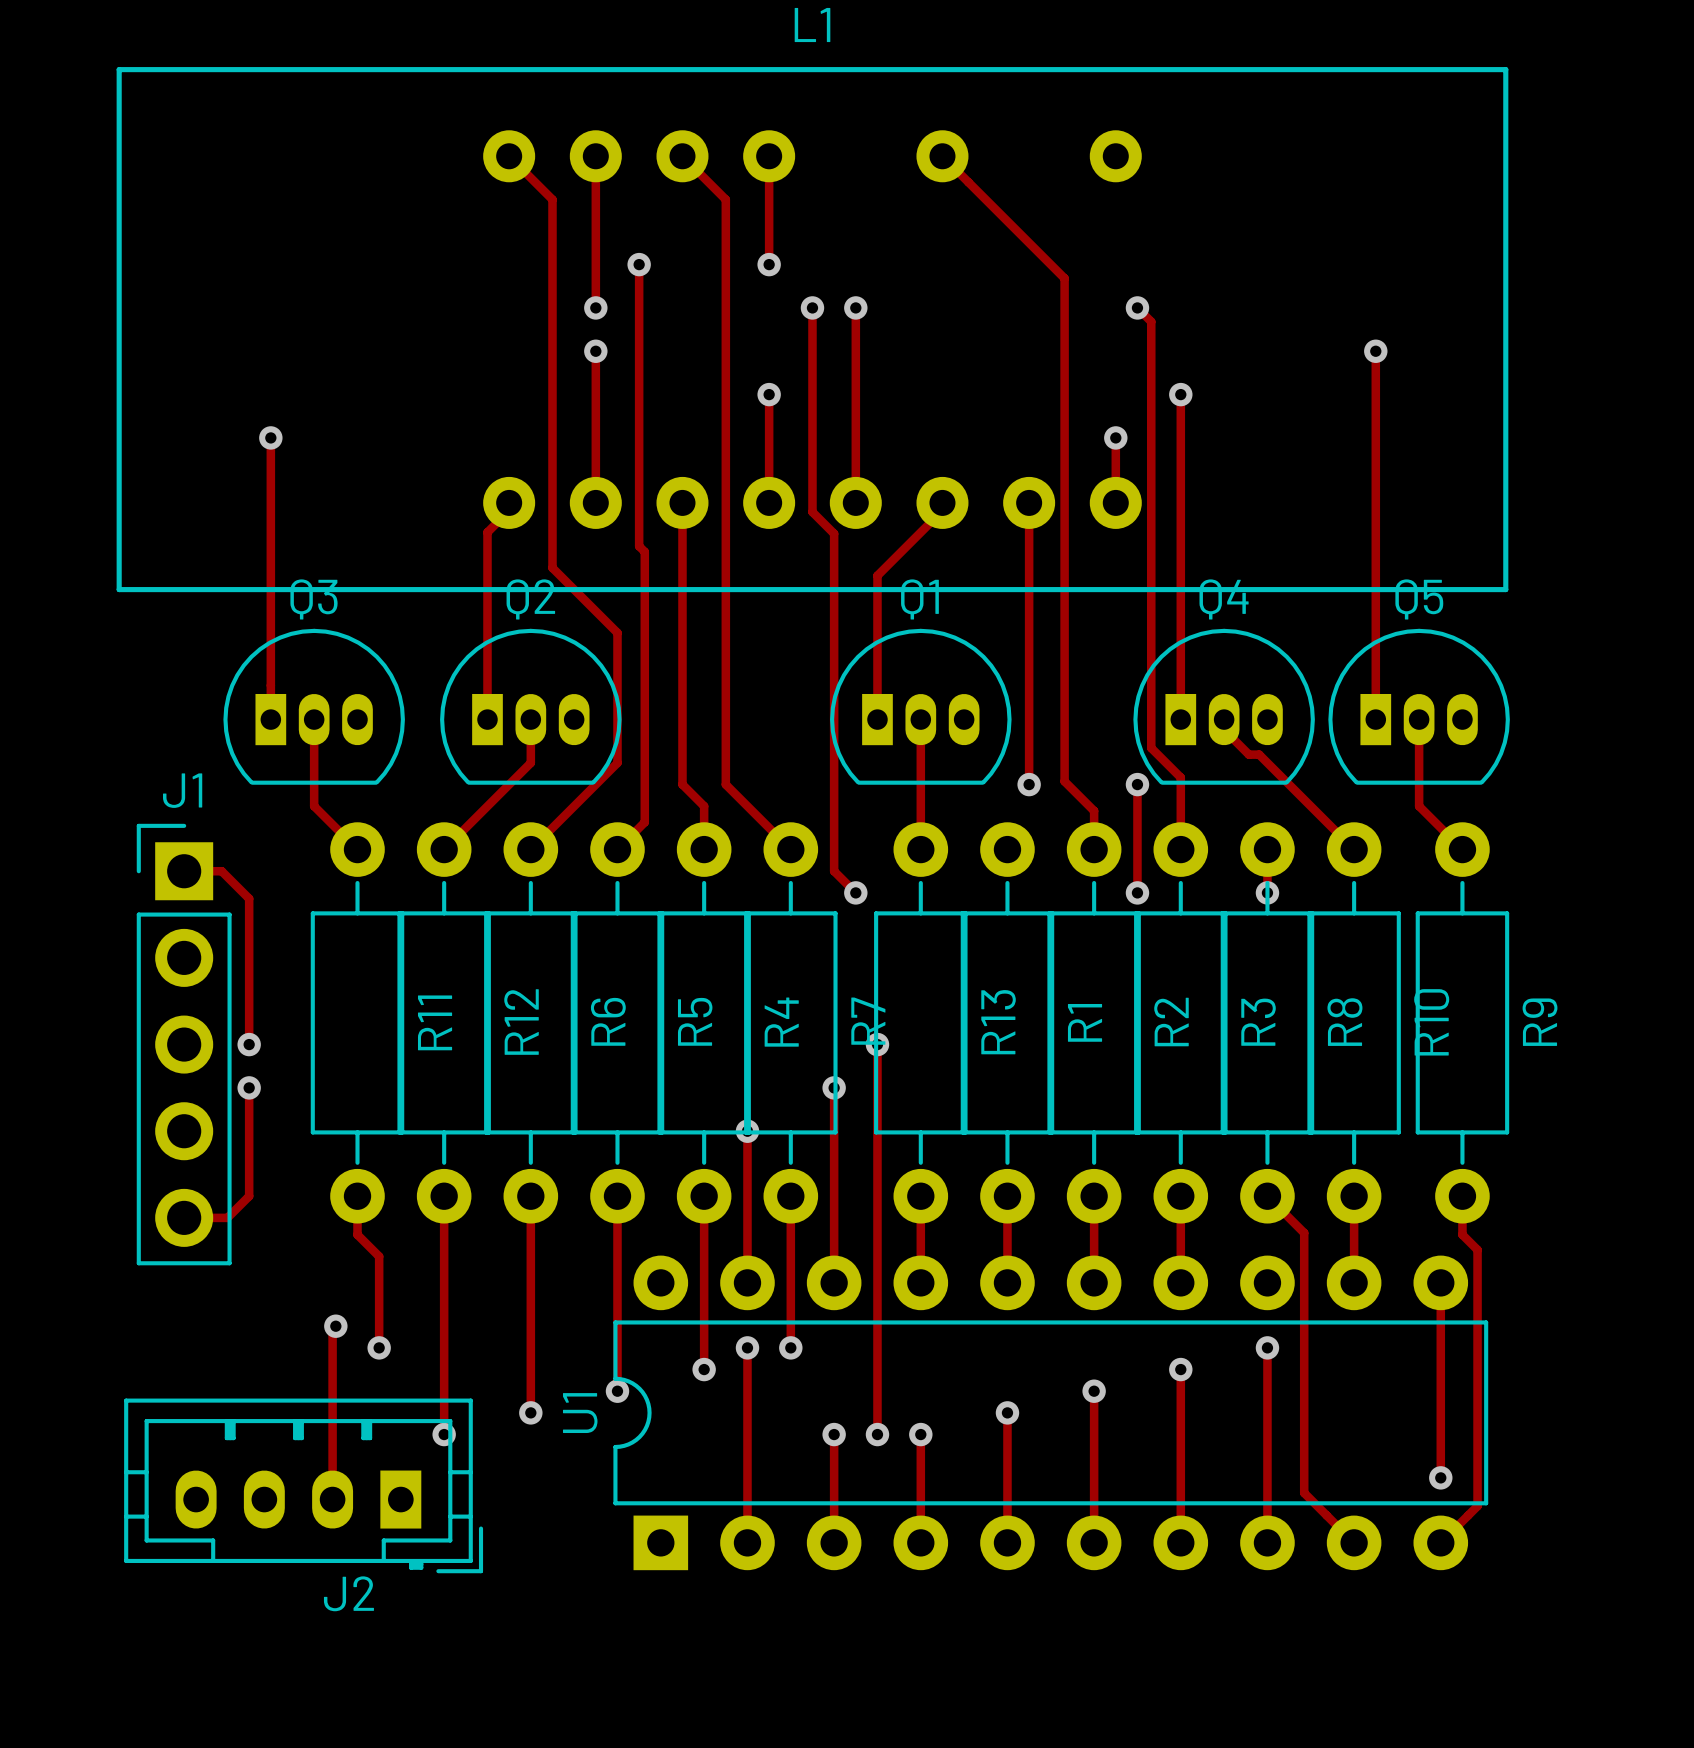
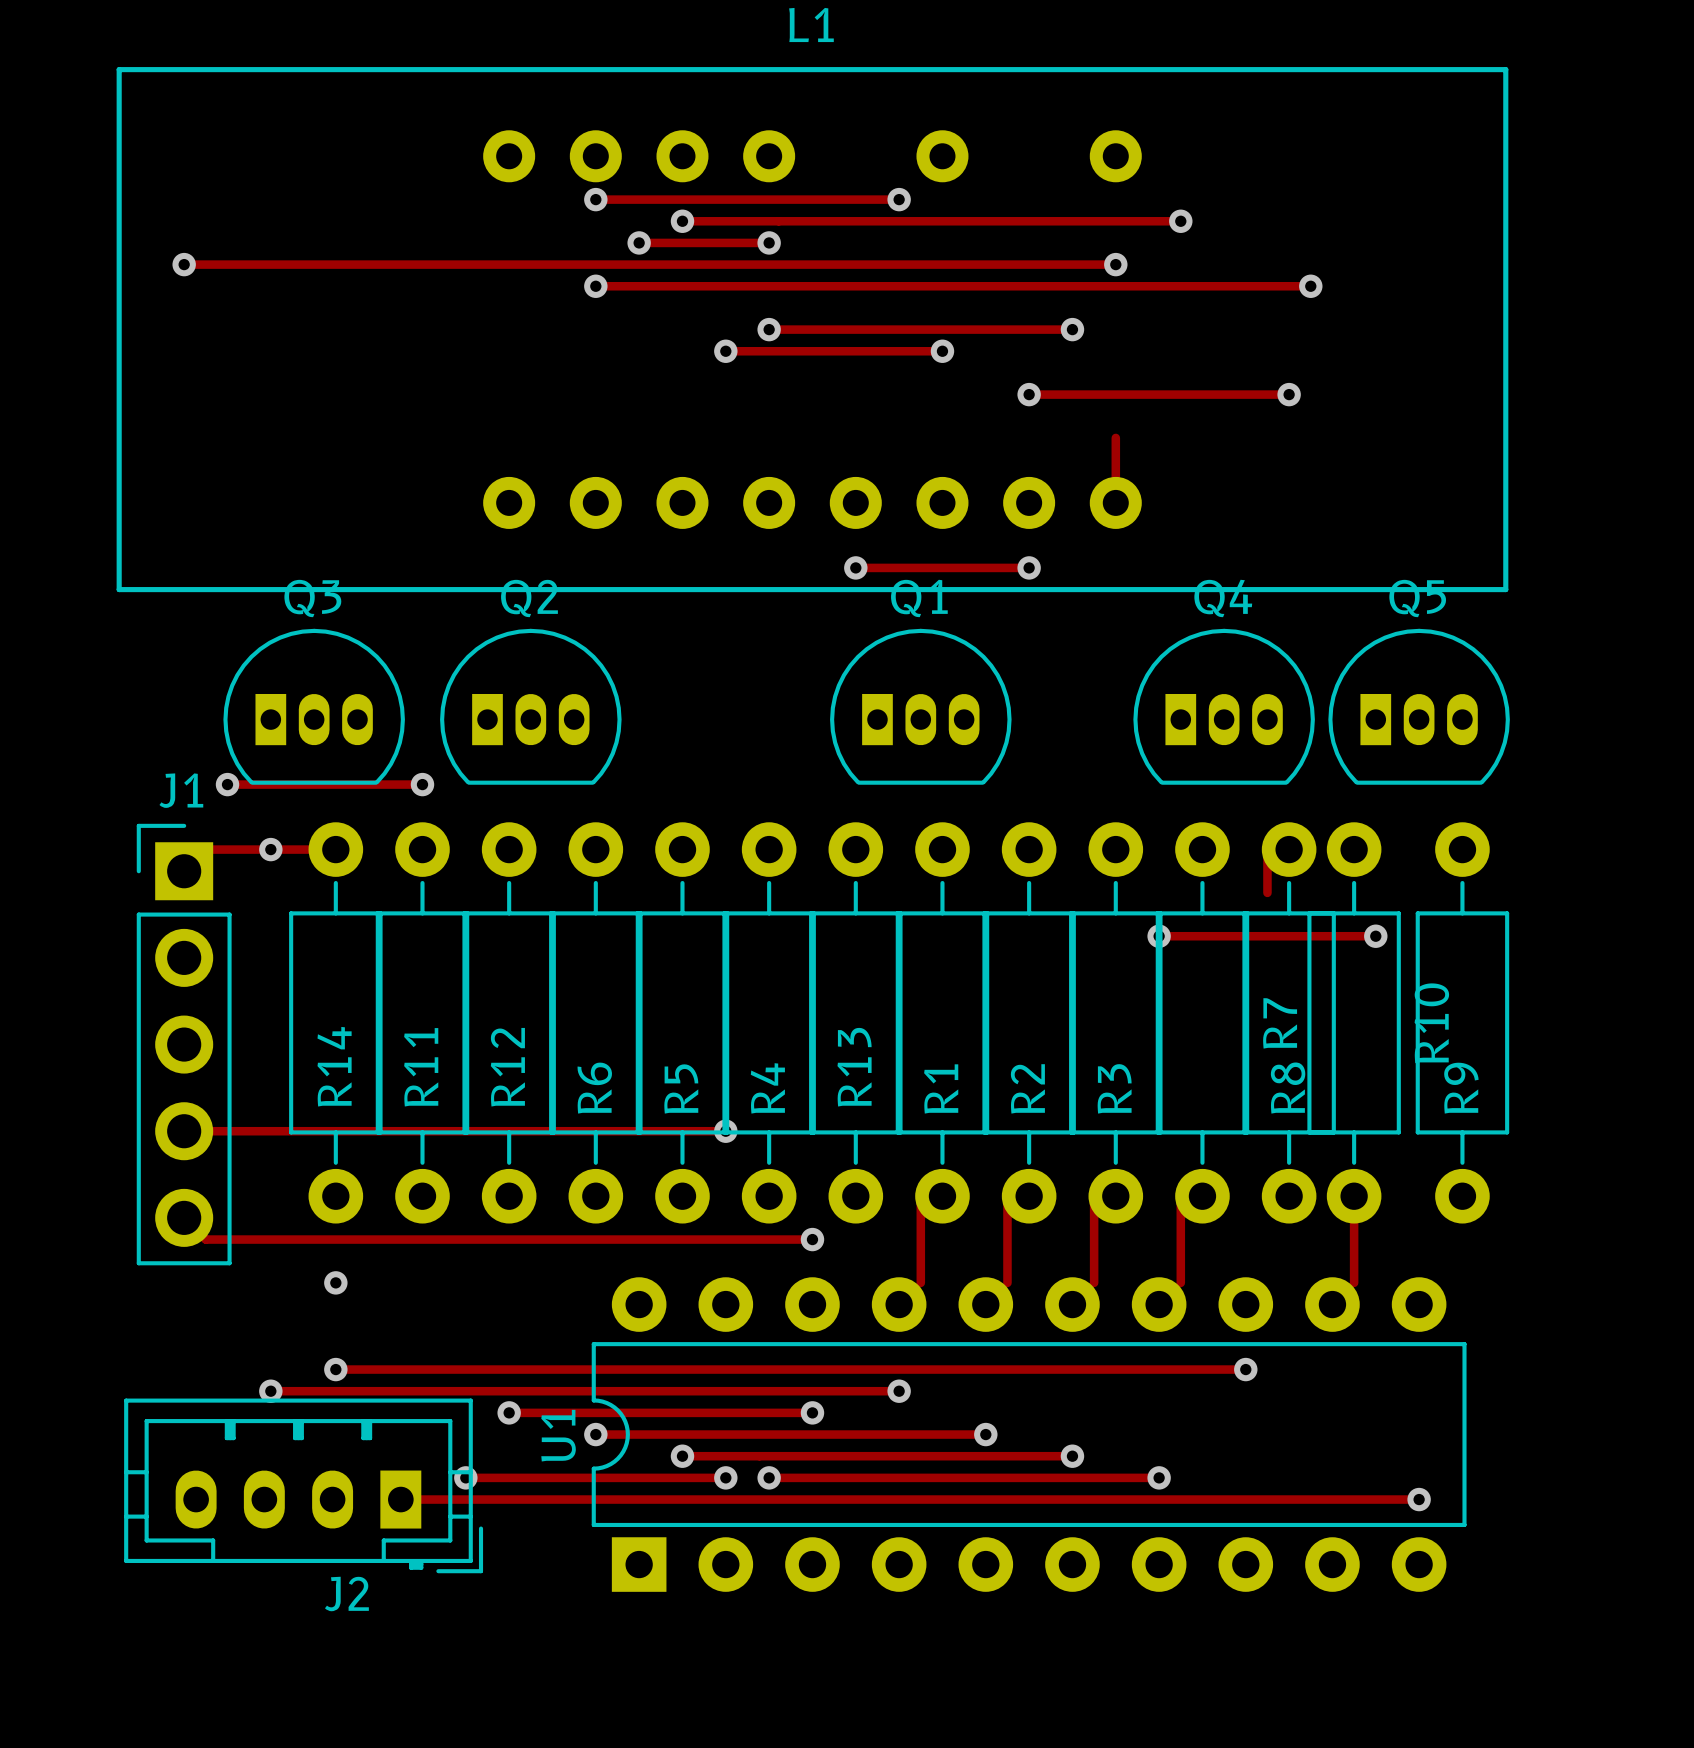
track: (509, 156) (552, 199) (552, 567) (617, 632) (617, 762) (530, 849) -> none
track: (595, 156) (595, 307) -> none
track: (682, 156) (725, 199) (725, 784) (790, 849) -> none
track: (769, 156) (769, 264) -> none
track: (942, 156) (1064, 278) (1064, 781) (1094, 810) (1094, 849) -> none
track: none -> (595, 199) (899, 199)
via: none -> (595, 199)
via: none -> (899, 199)
track: none -> (682, 221) (1180, 221)
via: none -> (682, 221)
via: none -> (1180, 221)
track: none -> (639, 242) (769, 242)
track: none -> (184, 264) (1115, 264)
via: none -> (184, 264)
track: (639, 264) (639, 546) (644, 551) (644, 822) (617, 849) -> none
via position: (639, 264) -> (639, 242)
via position: (769, 264) -> (769, 242)
via: none -> (1115, 264)
track: none -> (595, 286) (1310, 286)
via: none -> (1310, 286)
via position: (595, 307) -> (595, 286)
track: (812, 307) (812, 512) (834, 533) (834, 871) (855, 892) -> none
via: (812, 307) -> none
track: (855, 307) (855, 502) -> none
via: (855, 307) -> none
track: (1137, 307) (1151, 321) (1151, 748) (1180, 777) (1180, 849) -> none
via: (1137, 307) -> none
track: none -> (769, 329) (1072, 329)
via: none -> (769, 329)
via: none -> (1072, 329)
track: (595, 351) (595, 502) -> none
via: (595, 351) -> none
track: none -> (725, 351) (942, 351)
via: none -> (725, 351)
via: none -> (942, 351)
track: (1375, 351) (1375, 719) -> none
via: (1375, 351) -> none
track: (769, 394) (769, 502) -> none
via: (769, 394) -> none
track: none -> (1029, 394) (1289, 394)
via: none -> (1029, 394)
track: (1180, 394) (1180, 719) -> none
via: (1180, 394) -> none
via: none -> (1289, 394)
track: (270, 437) (270, 719) -> none
via: (270, 437) -> none
via: (1115, 437) -> none
track: (516, 502) (487, 532) (487, 719) -> none
track: (682, 502) (682, 784) (704, 806) (704, 849) -> none
track: (950, 502) (877, 575) (877, 719) -> none
track: (1029, 502) (1029, 784) -> none
track: none -> (855, 567) (1029, 567)
via: none -> (855, 567)
via: none -> (1029, 567)
track: (314, 719) (314, 806) (357, 849) -> none
track: (530, 719) (530, 762) (444, 849) -> none
track: (920, 719) (920, 849) -> none
track: (1224, 719) (1224, 729) (1248, 754) (1259, 754) (1354, 849) -> none
track: (1419, 719) (1419, 806) (1462, 849) -> none
track: none -> (227, 784) (422, 784)
via: none -> (227, 784)
via: none -> (422, 784)
via: (1029, 784) -> none
track: (1137, 784) (1137, 892) -> none
via: (1137, 784) -> none
via: none -> (270, 849)
track: (184, 871) (221, 871) (249, 898) (249, 1044) -> (184, 871) (205, 849) (335, 849)
via: (855, 892) -> none
via position: (1137, 892) -> (1159, 936)
via: (1267, 892) -> none
track: none -> (1159, 936) (1375, 936)
via: none -> (1375, 936)
R6 name position: R6 (608, 1021) -> R6 (594, 1088)
R5 name position: R5 (695, 1021) -> R5 (681, 1088)
R14: none -> (335, 1022)
R11 position: (357, 1022) -> (422, 1022)
R11 name position: R11 (435, 1022) -> R11 (421, 1067)
R12 position: (444, 1022) -> (509, 1022)
R12 name position: R12 (521, 1022) -> R12 (507, 1067)
R6 position: (530, 1022) -> (595, 1022)
R5 position: (617, 1022) -> (682, 1022)
R4 position: (704, 1022) -> (769, 1022)
R4 name position: R4 (781, 1022) -> R4 (767, 1088)
R7 position: (790, 1022) -> (1202, 1022)
R13 position: (920, 1022) -> (855, 1022)
R13 name position: R13 (998, 1022) -> R13 (854, 1067)
R1 position: (1007, 1022) -> (942, 1022)
R1 name position: R1 (1085, 1022) -> R1 (941, 1088)
R2 position: (1094, 1022) -> (1029, 1022)
R2 name position: R2 (1171, 1022) -> R2 (1027, 1088)
R3 position: (1180, 1022) -> (1115, 1022)
R3 name position: R3 (1258, 1022) -> R3 (1114, 1088)
R8 position: (1267, 1022) -> (1289, 1022)
R8 name position: R8 (1344, 1022) -> R8 (1288, 1088)
R9 name position: R9 (1540, 1022) -> R9 (1461, 1088)
via: (249, 1044) -> none
track: (877, 1044) (877, 1434) -> none
via: (877, 1044) -> none
track: (249, 1087) (249, 1196) (227, 1217) (184, 1217) -> (812, 1239) (205, 1239) (184, 1217)
via: (249, 1087) -> none
track: (834, 1087) (834, 1282) -> none
via: (834, 1087) -> none
track: none -> (184, 1131) (725, 1131)
track: (747, 1131) (747, 1282) -> none
via position: (747, 1131) -> (725, 1131)
track: (357, 1196) (357, 1234) (379, 1256) (379, 1347) -> none
track: (444, 1196) (444, 1434) -> none
track: (530, 1196) (530, 1412) -> none
track: (617, 1196) (617, 1391) -> none
track: (704, 1196) (704, 1369) -> none
track: (790, 1196) (790, 1347) -> none
track: (1267, 1196) (1304, 1232) (1304, 1492) (1354, 1542) -> none
track: (1462, 1196) (1462, 1234) (1477, 1249) (1477, 1506) (1440, 1542) -> none
via: none -> (812, 1239)
via: none -> (335, 1282)
track: (1440, 1282) (1440, 1477) -> none
track: (332, 1326) (332, 1474) -> none
via: (335, 1326) -> none
via: (379, 1347) -> none
track: (747, 1347) (747, 1542) -> none
via: (747, 1347) -> none
via: (790, 1347) -> none
track: (1267, 1347) (1267, 1542) -> none
via position: (1267, 1347) -> (1245, 1369)
track: none -> (335, 1369) (1245, 1369)
via: none -> (335, 1369)
via: (704, 1369) -> none
track: (1180, 1369) (1180, 1542) -> none
via: (1180, 1369) -> none
track: none -> (270, 1391) (899, 1391)
via: none -> (270, 1391)
via: (617, 1391) -> none
via: none -> (899, 1391)
track: (1094, 1391) (1094, 1542) -> none
via: (1094, 1391) -> none
track: none -> (509, 1412) (812, 1412)
via position: (530, 1412) -> (509, 1412)
track: (1007, 1412) (1007, 1542) -> none
via position: (1007, 1412) -> (985, 1434)
U1 position: (1050, 1412) -> (1029, 1434)
via: (444, 1434) -> none
track: none -> (595, 1434) (985, 1434)
via: none -> (595, 1434)
track: (834, 1434) (834, 1542) -> none
via position: (834, 1434) -> (812, 1412)
via: (877, 1434) -> none
track: (920, 1434) (920, 1542) -> none
via: (920, 1434) -> none
track: none -> (682, 1456) (1072, 1456)
via: none -> (682, 1456)
via: none -> (1072, 1456)
track: none -> (465, 1477) (725, 1477)
via: none -> (465, 1477)
via: none -> (725, 1477)
track: none -> (769, 1477) (1159, 1477)
via: none -> (769, 1477)
via: none -> (1159, 1477)
via position: (1440, 1477) -> (1419, 1499)
track: none -> (400, 1499) (1419, 1499)

